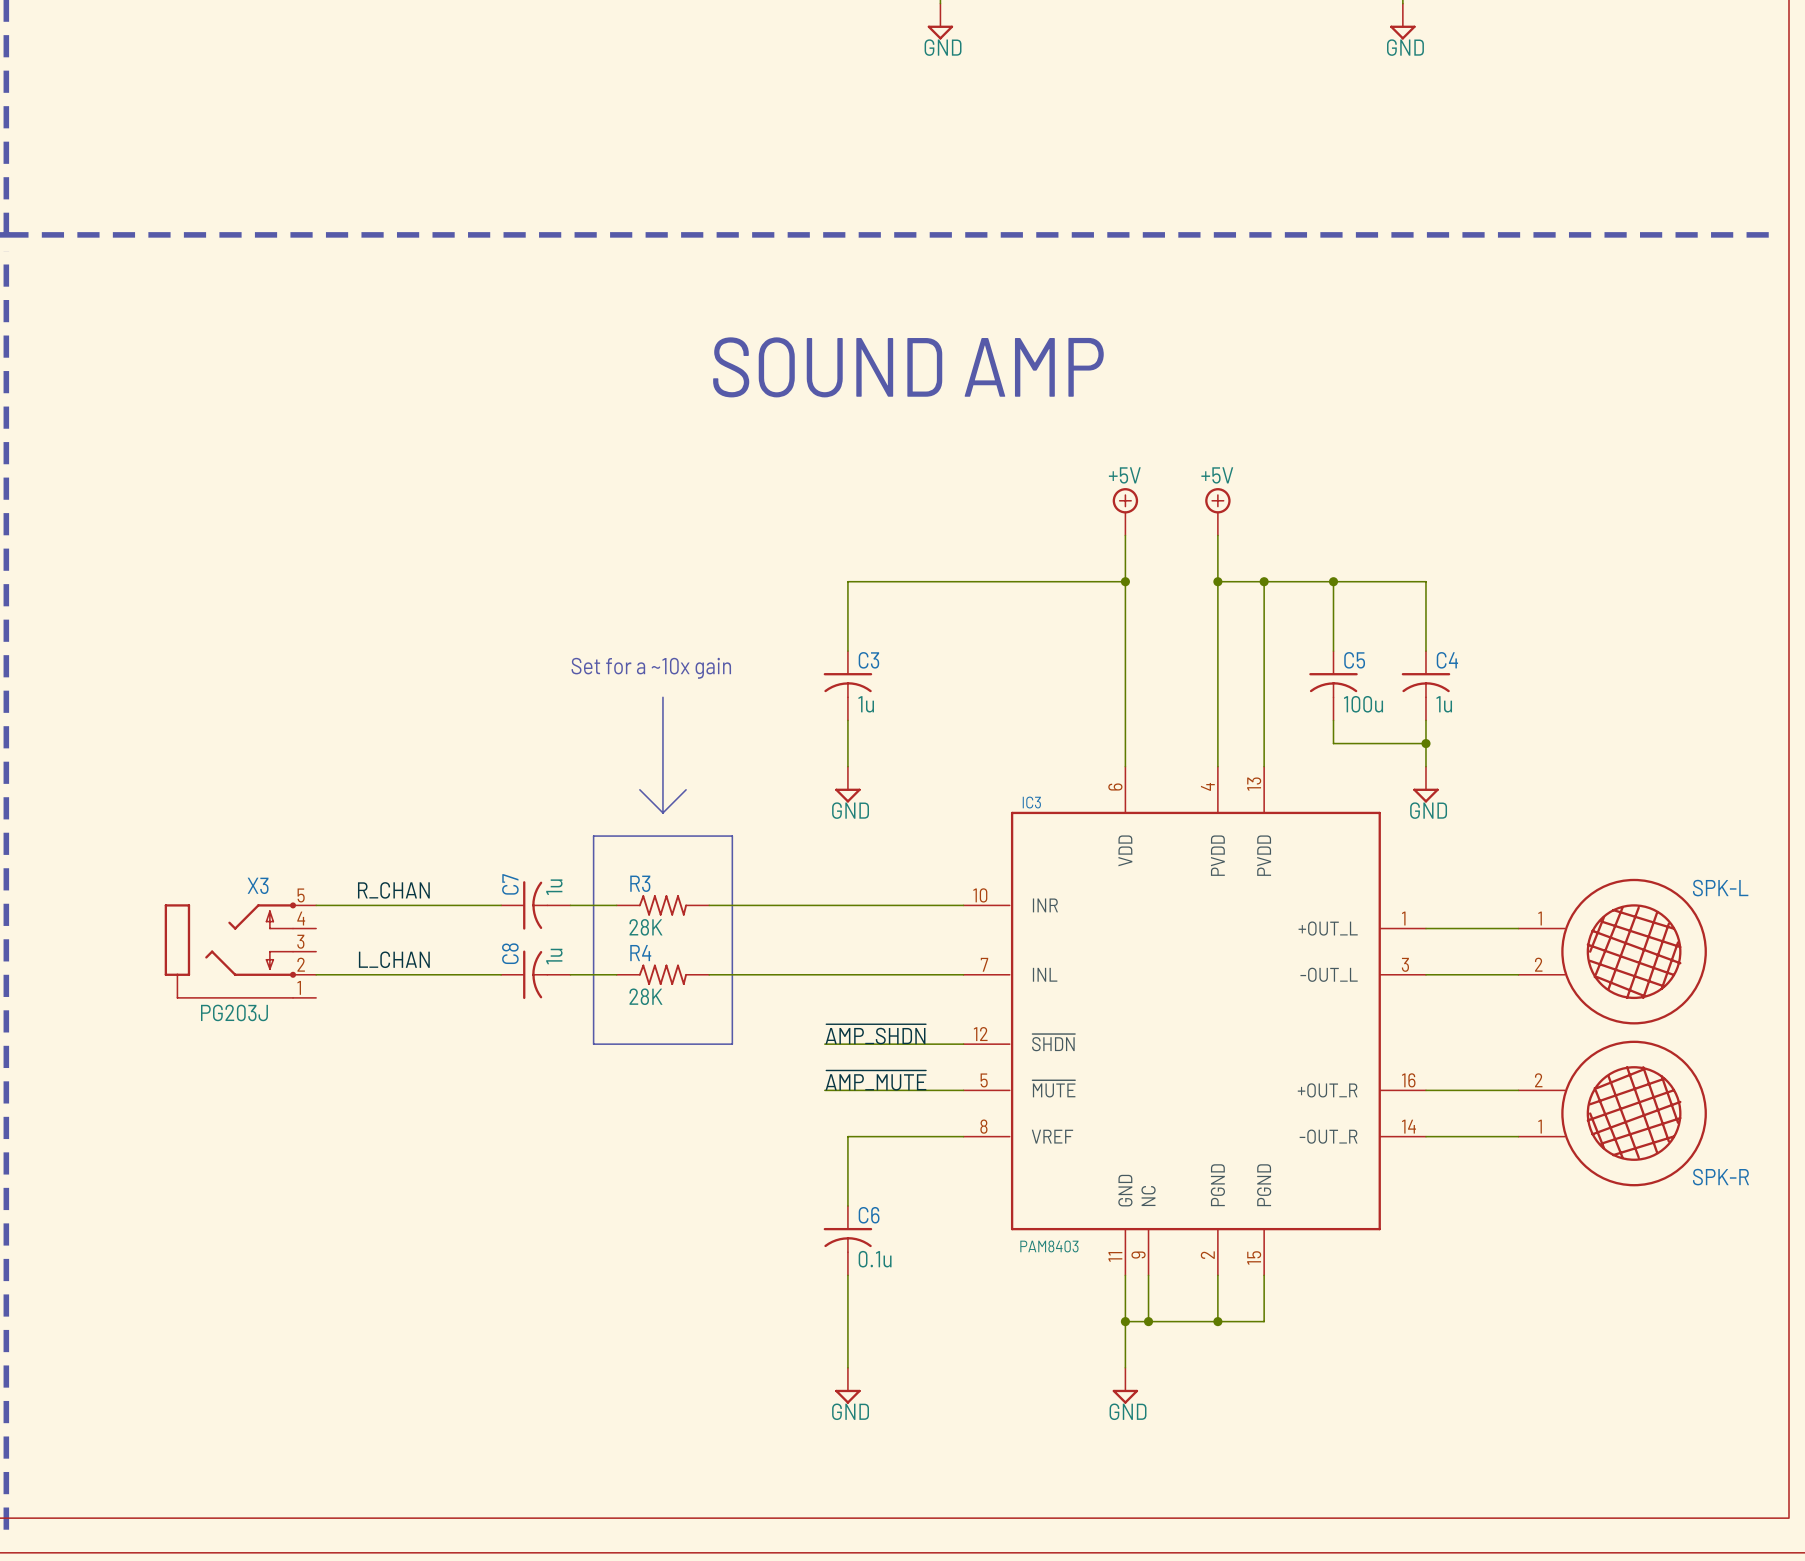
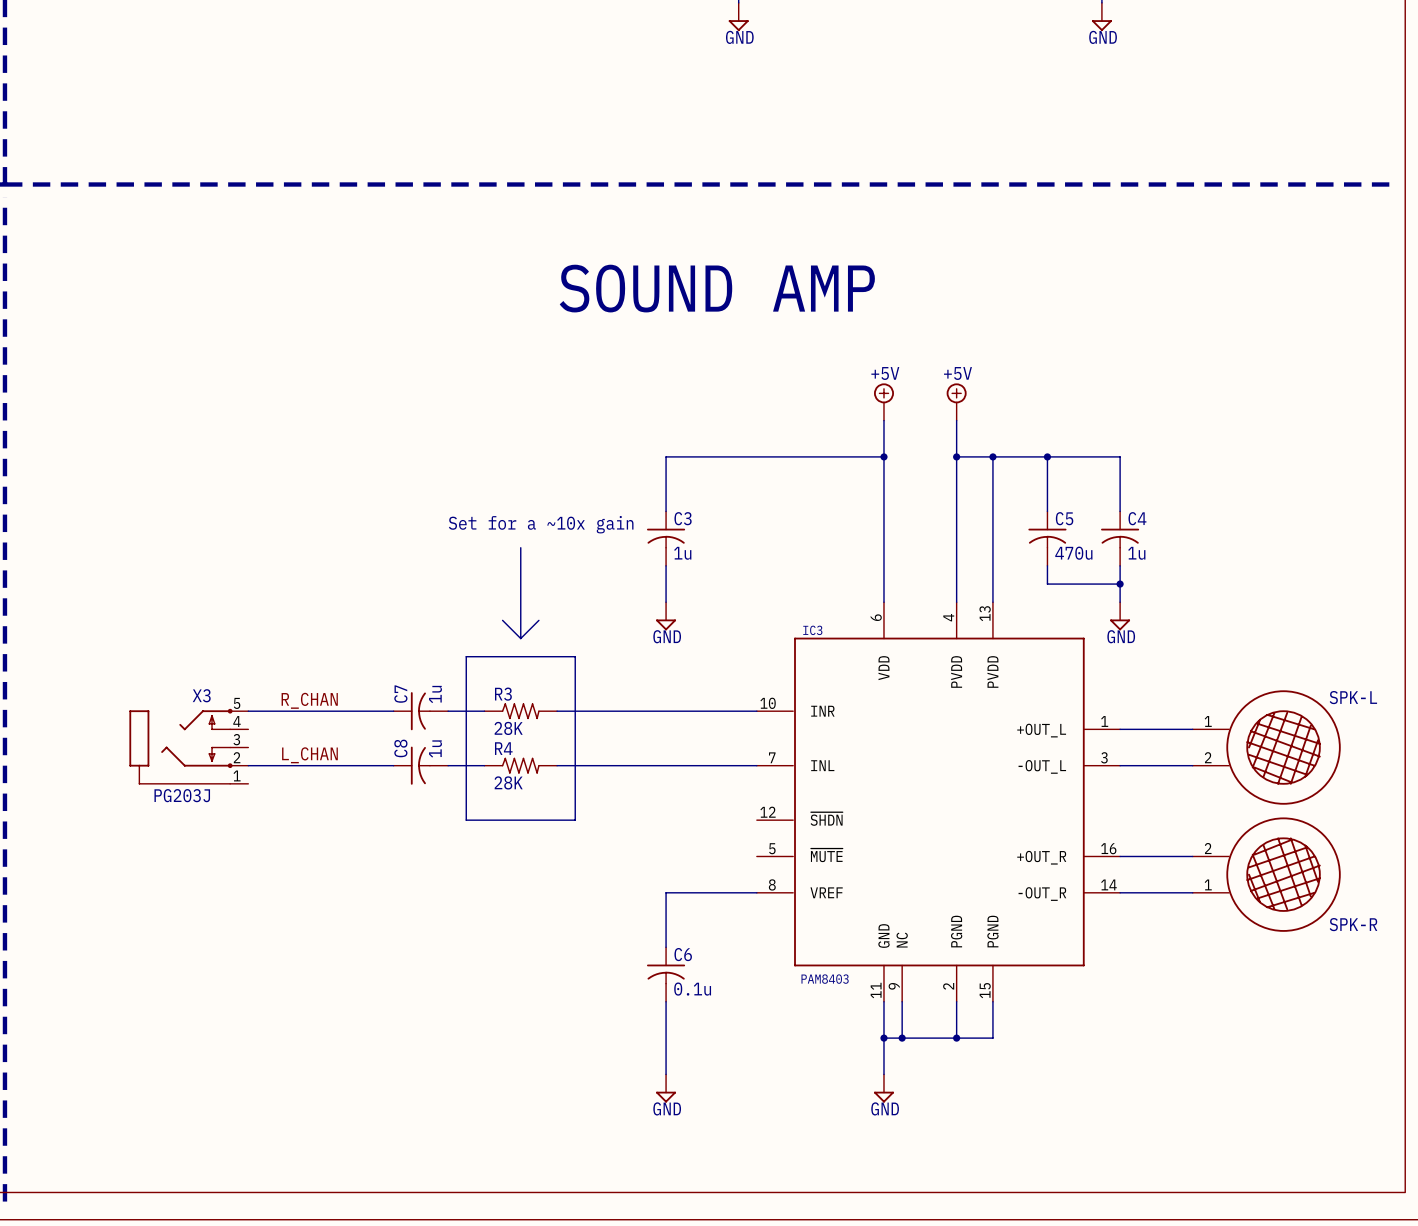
C5 value: 100u (1363, 704) -> 470u (1073, 553)
label: ~{AMP_SHDN} (875, 1034) -> none
wire: (824, 1044) (963, 1044) -> none
label: ~{AMP_MUTE} (875, 1080) -> none
wire: (824, 1090) (963, 1090) -> none

